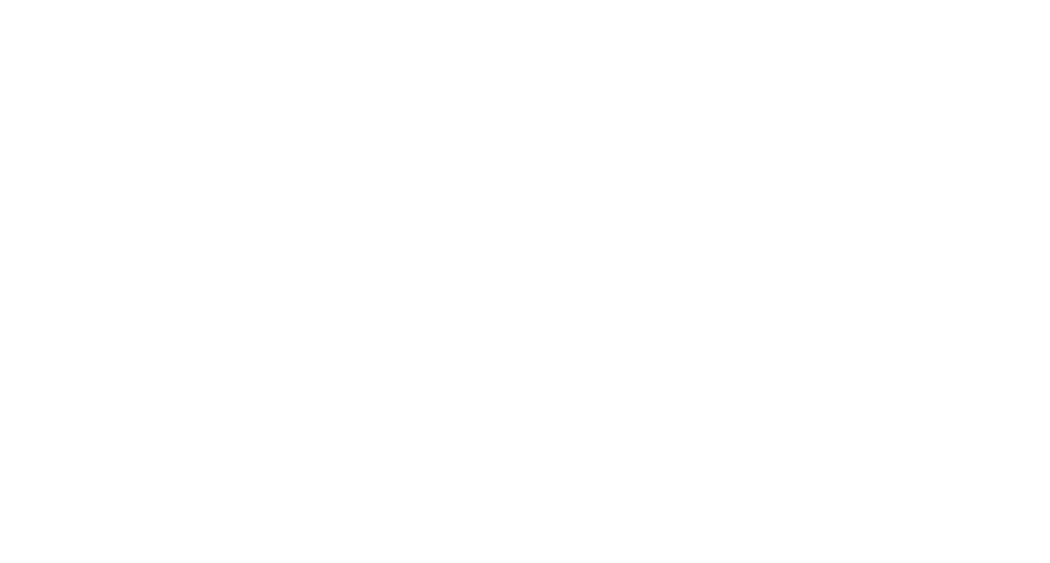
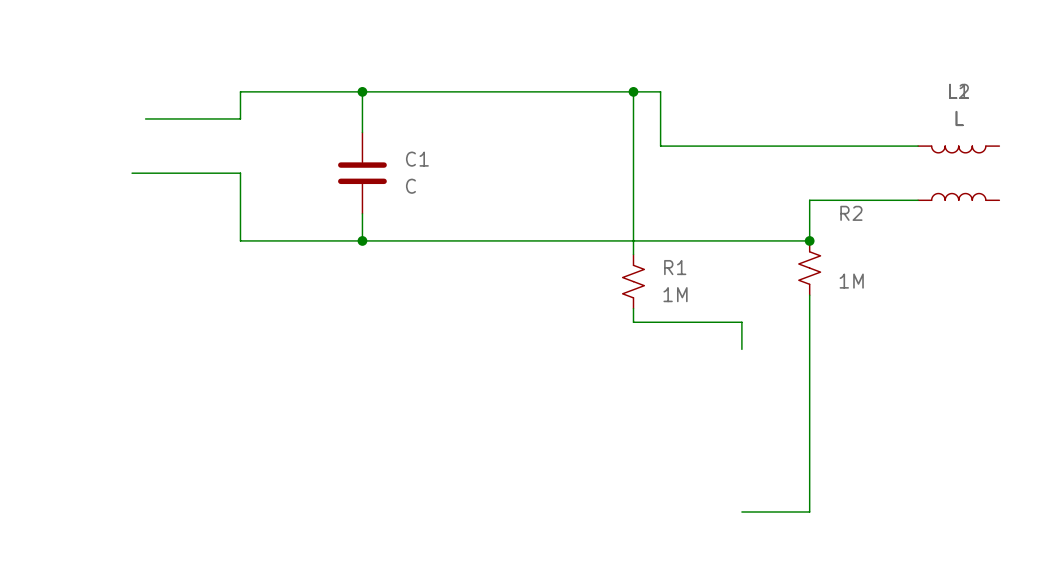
wire: none -> (362, 91) (362, 132)
junction: none -> (362, 91)
wire: none -> (633, 91) (633, 254)
junction: none -> (633, 91)
wire: none -> (145, 118) (240, 118) (240, 91) (660, 91) (660, 146) (918, 146)
part: none -> L (958, 149)
wire: none -> (132, 173) (240, 173) (240, 240) (809, 240) (809, 200) (918, 200)
C1: none -> C (362, 173)
part: none -> L (958, 196)
wire: none -> (362, 213) (362, 240)
junction: none -> (362, 240)
junction: none -> (809, 240)
R2: none -> 1M (809, 268)
R1: none -> 1M (633, 281)
wire: none -> (809, 295) (809, 511) (741, 511)
wire: none -> (633, 308) (633, 322) (741, 322) (741, 349)

